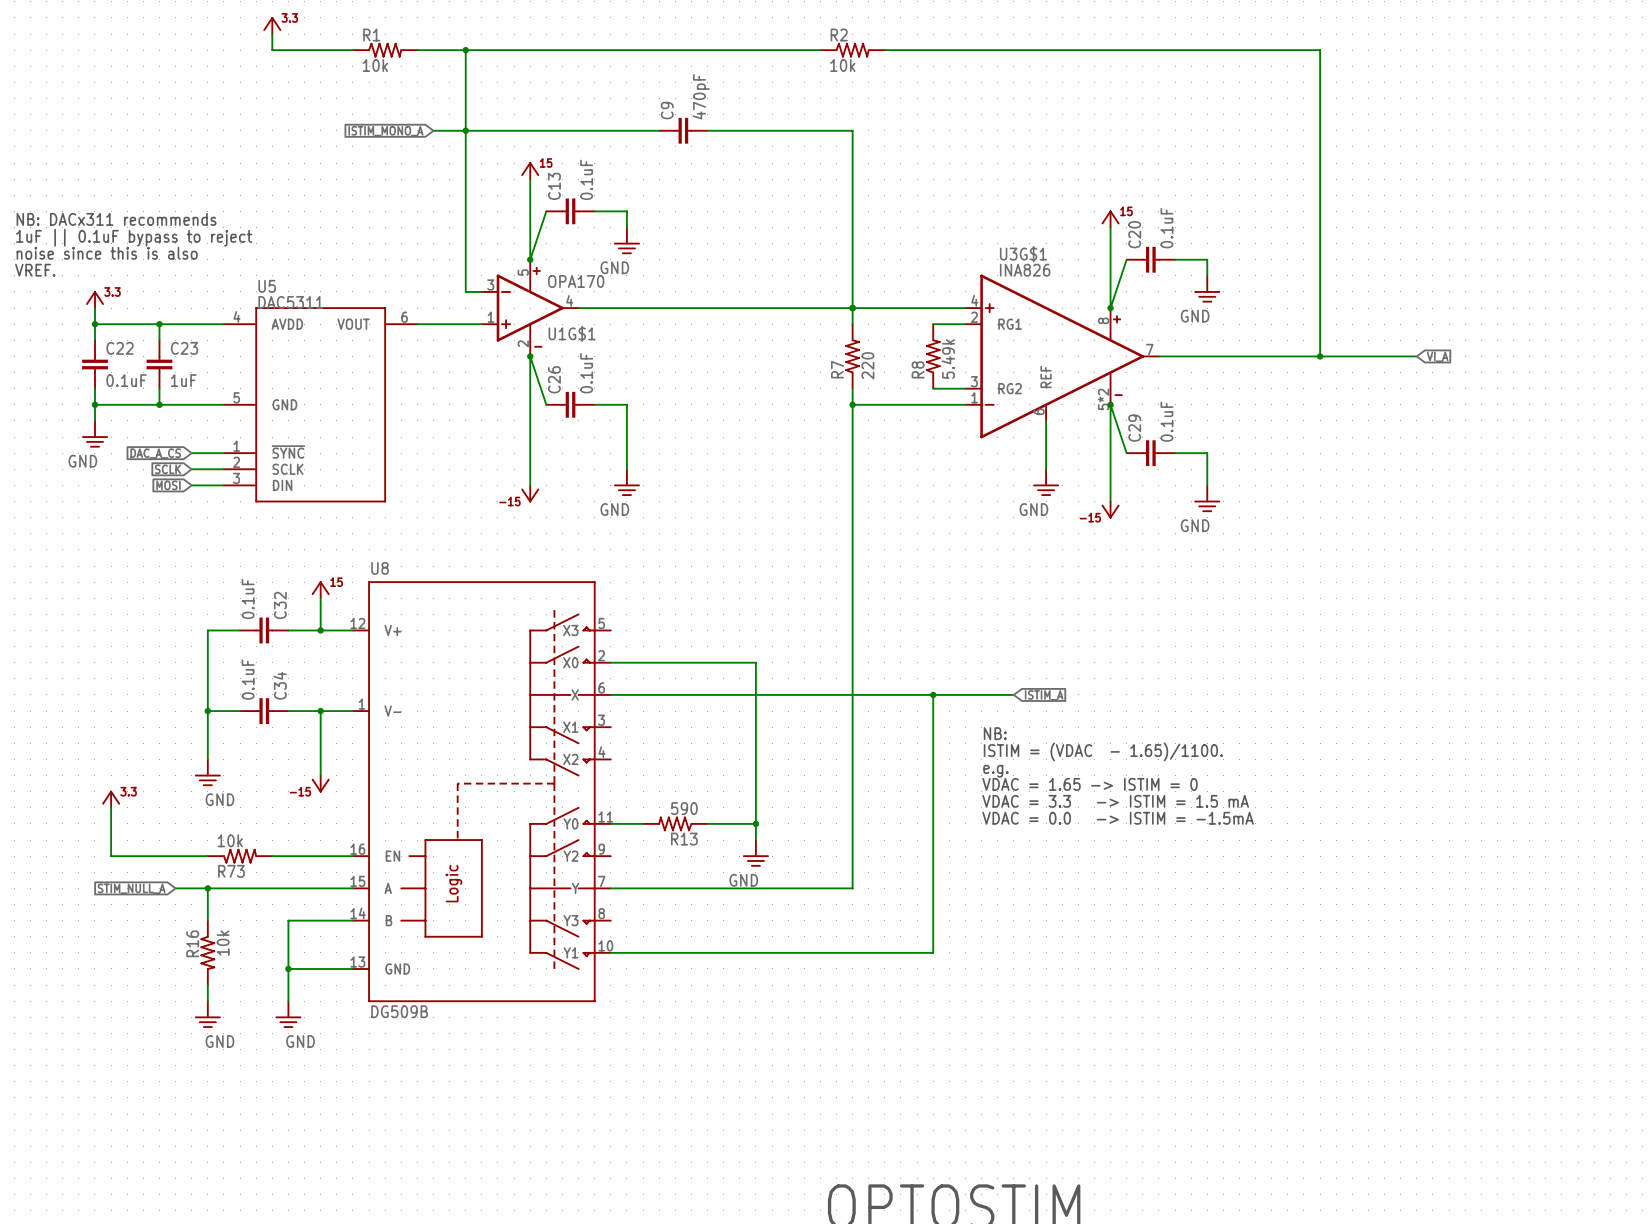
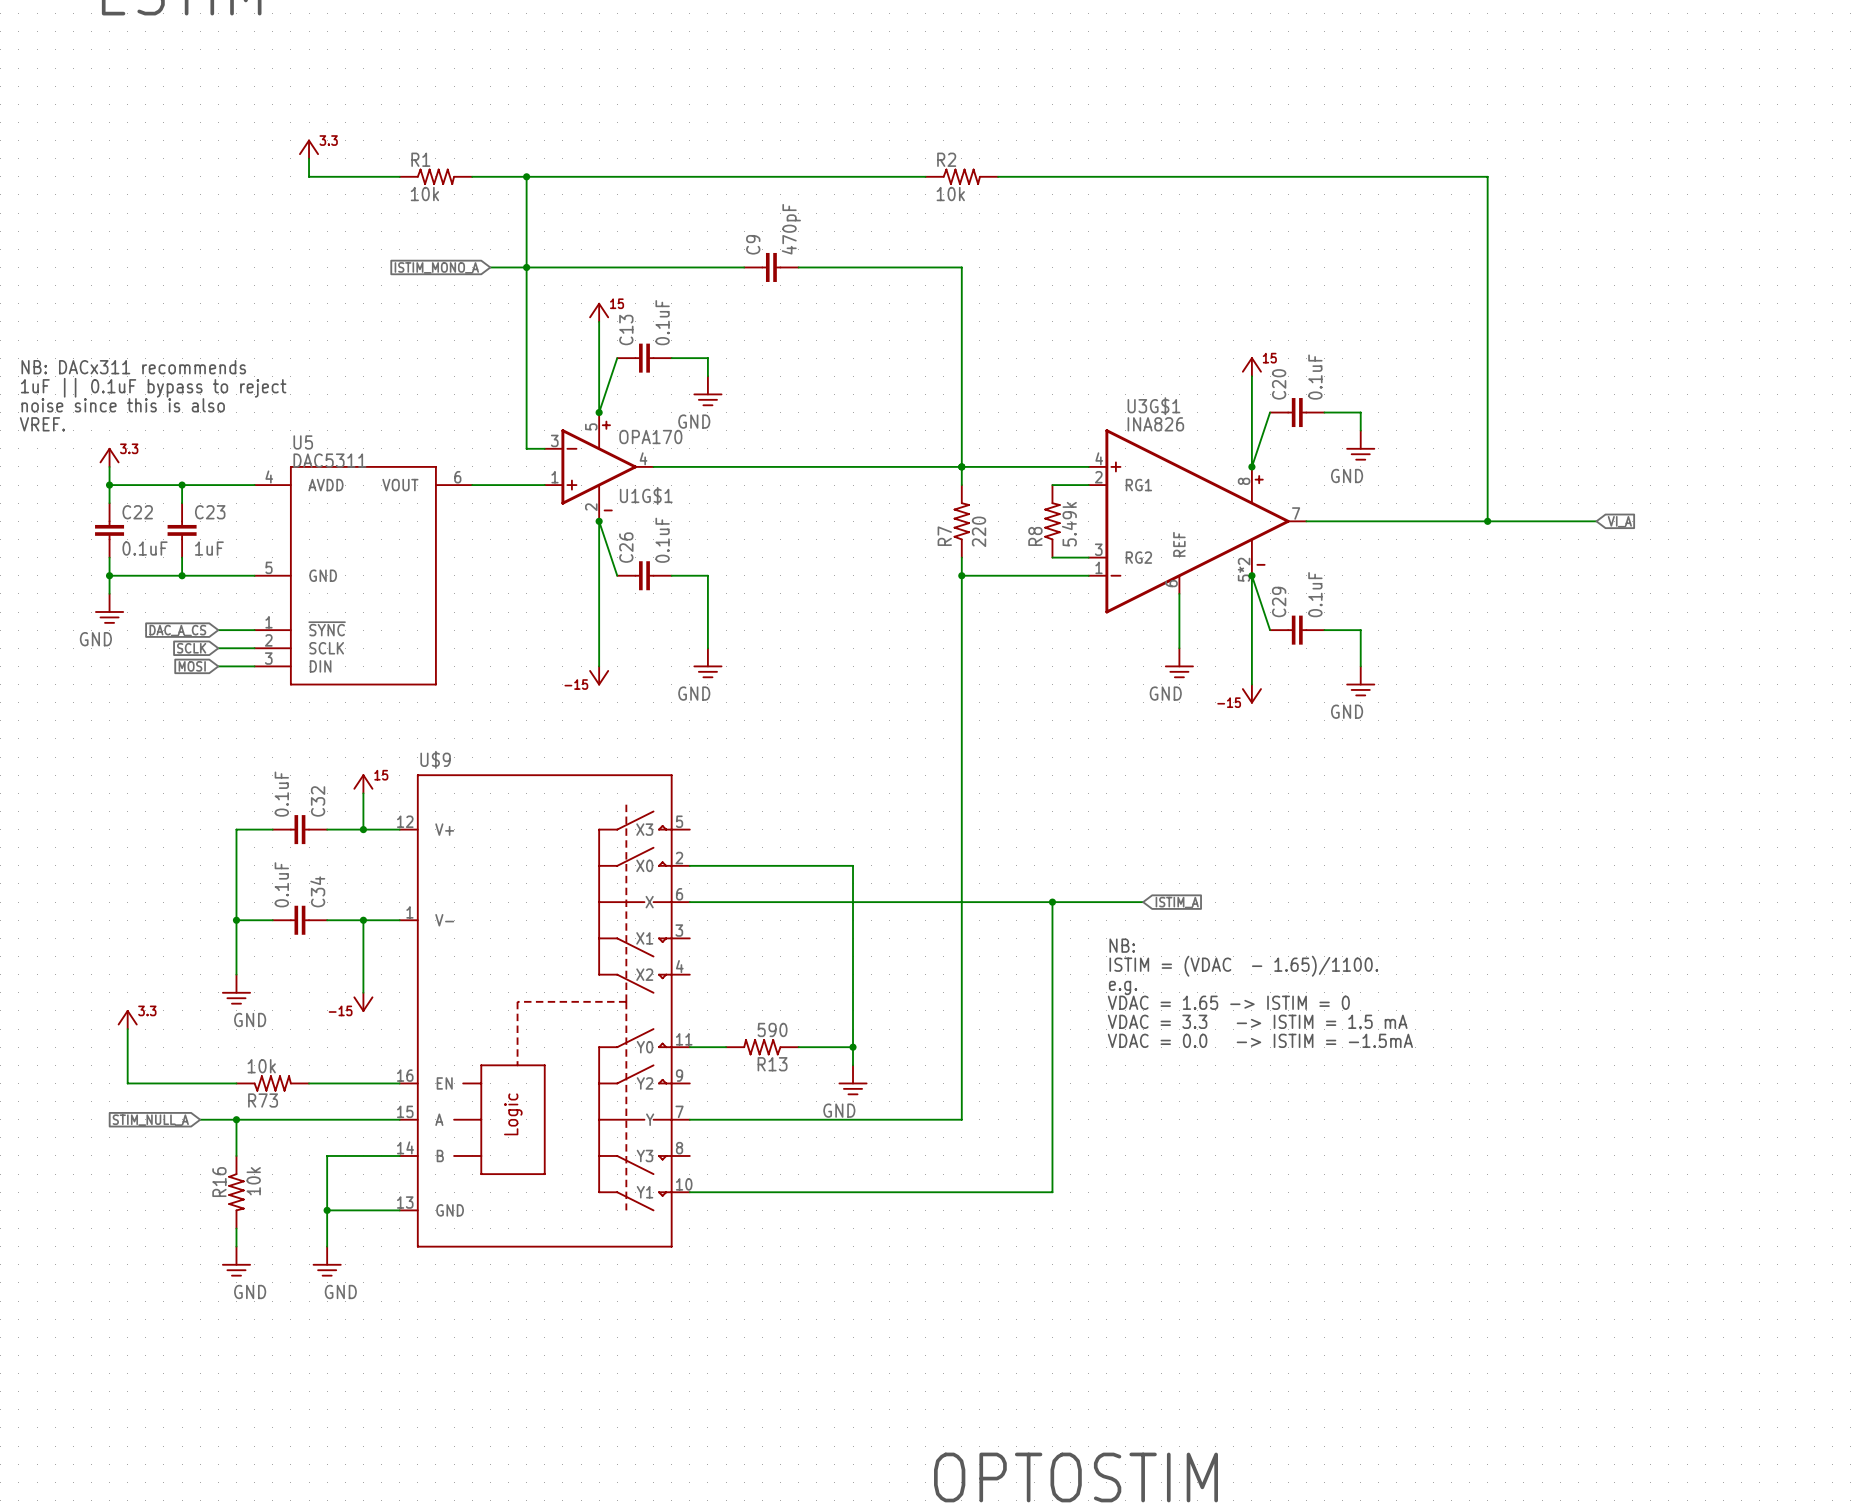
U8 name: U8 (380, 568) -> U$9 (435, 759)
U8 value: DG509B (399, 1011) -> none

